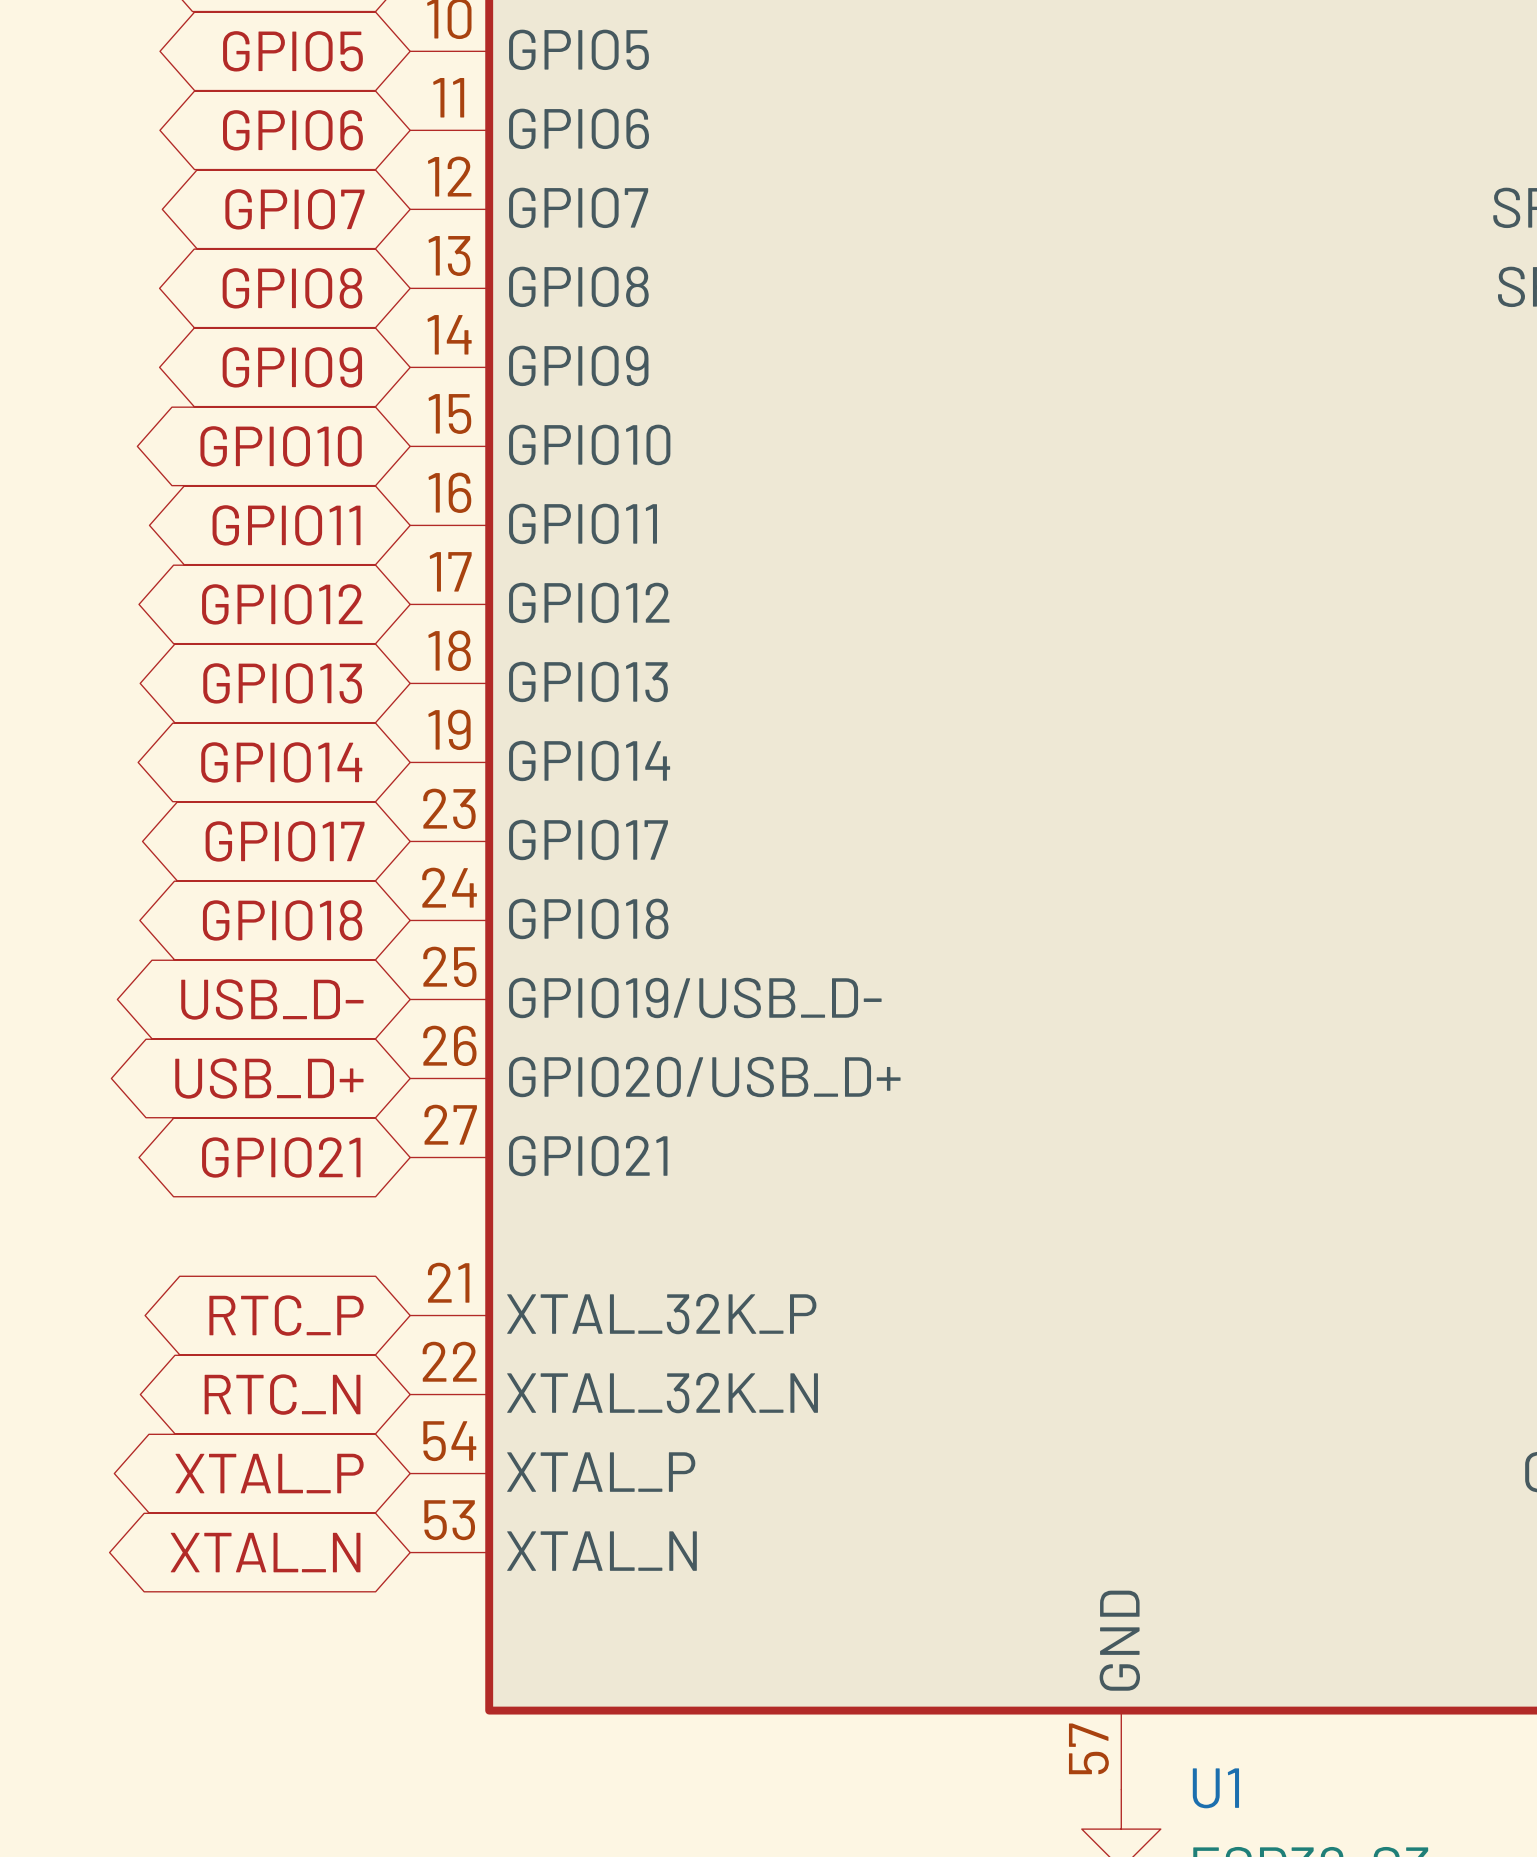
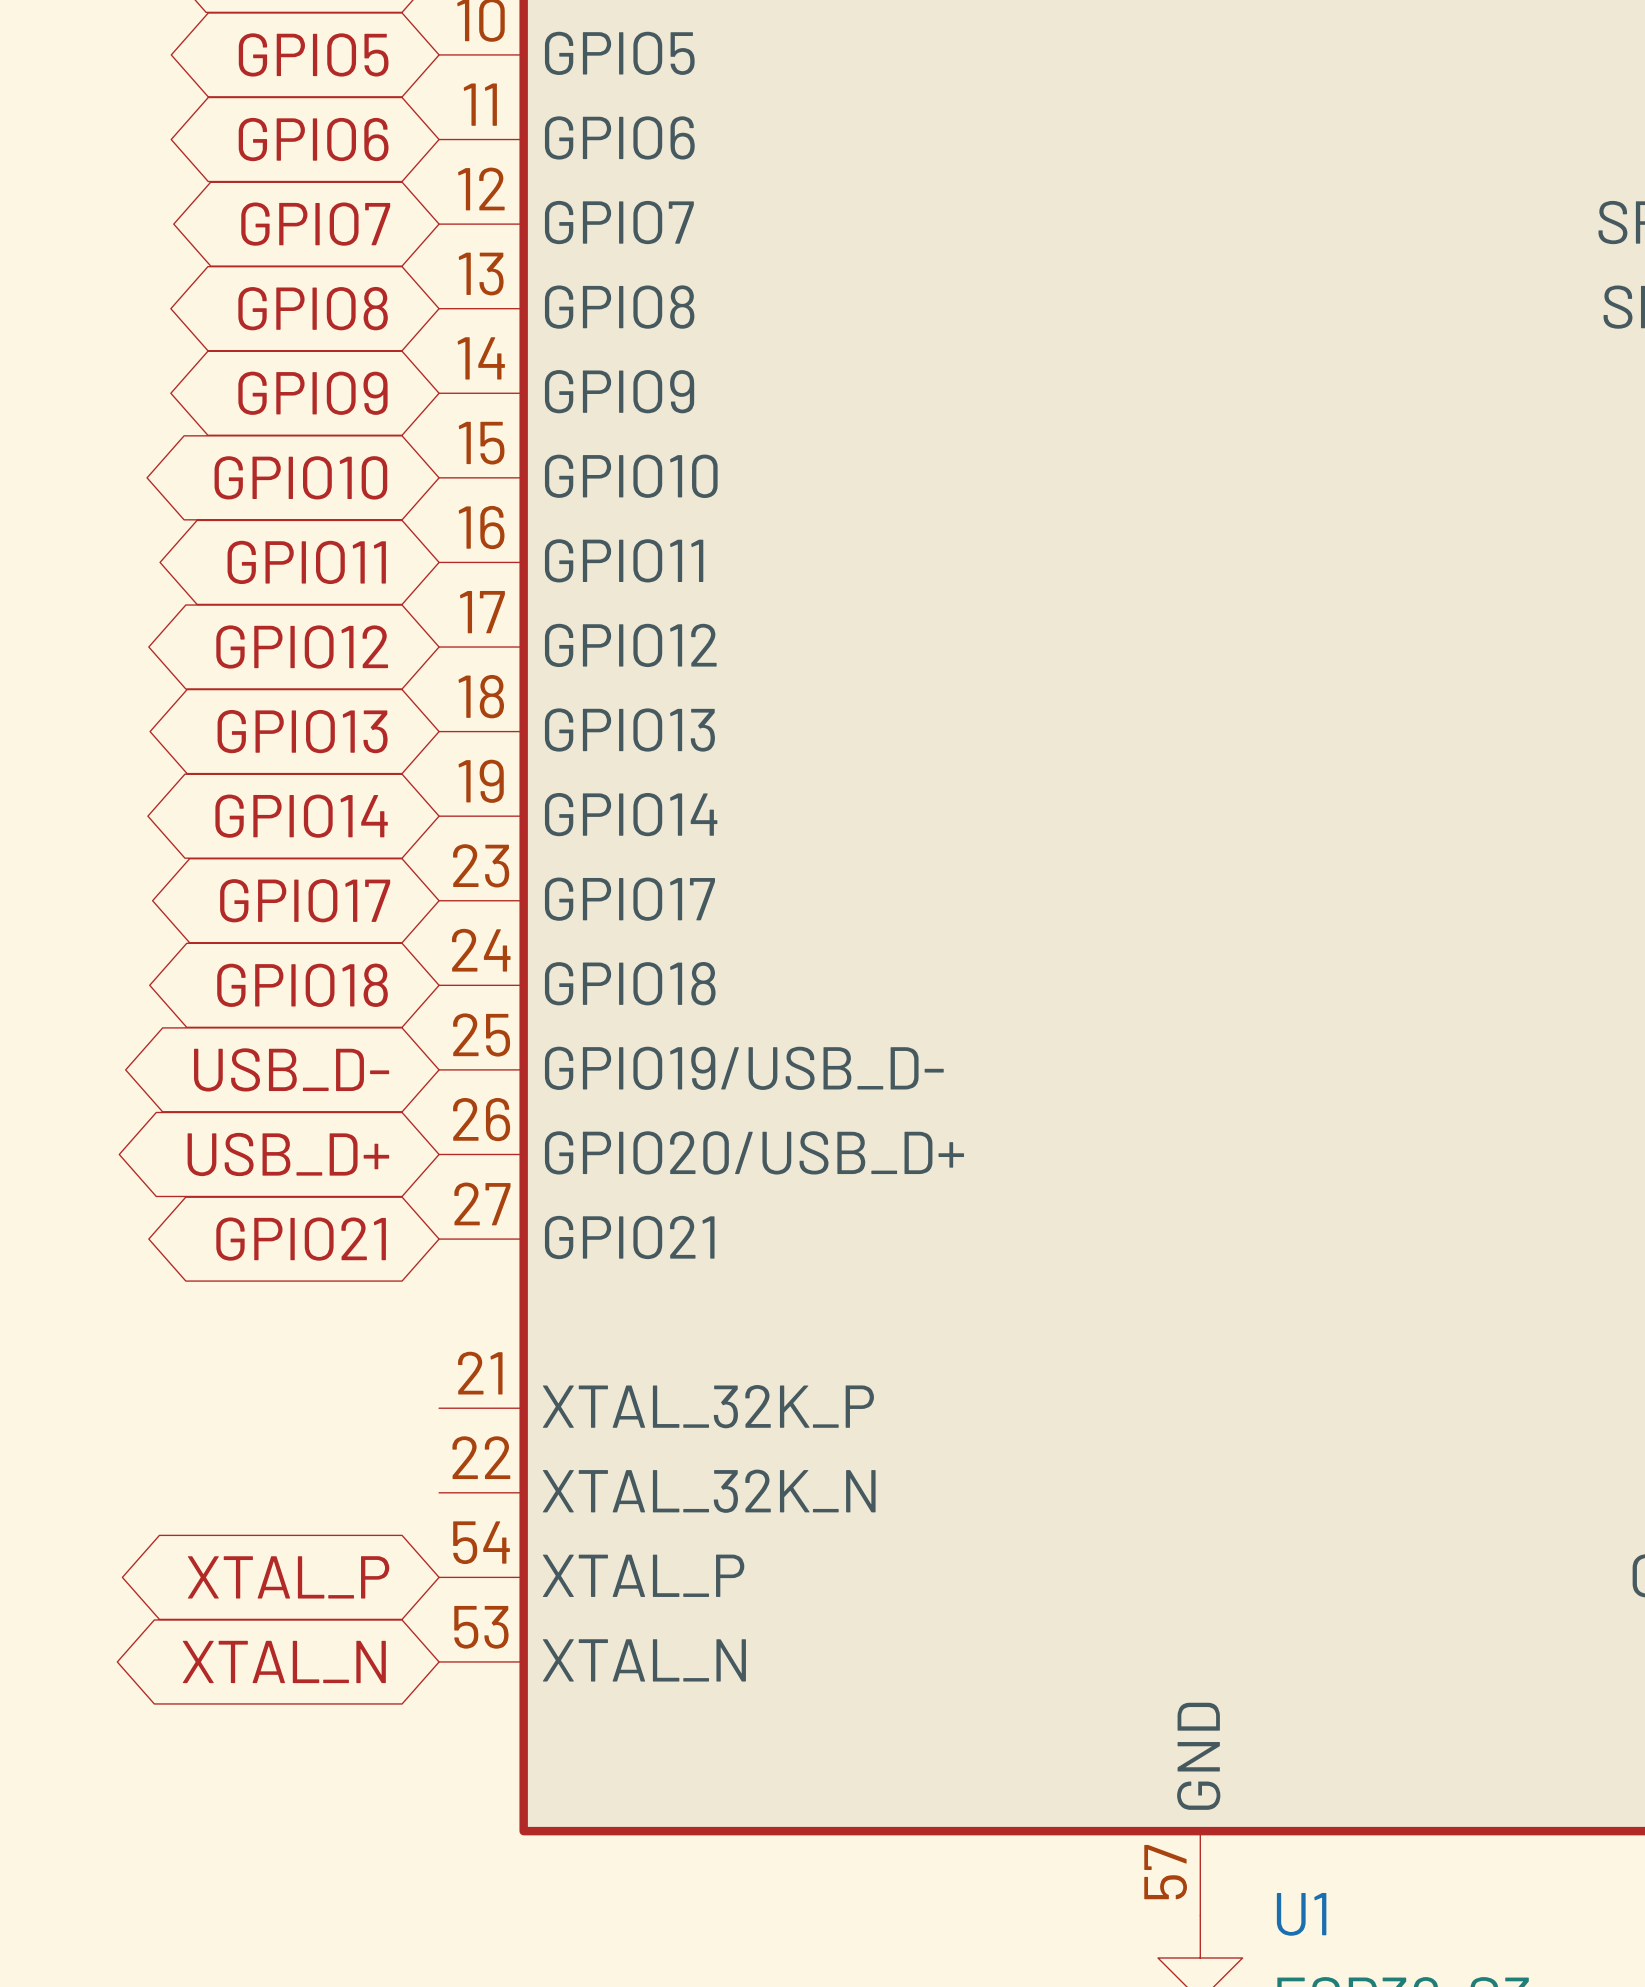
global label: RTC_P (286, 1315) -> none
global label: RTC_N (282, 1394) -> none

